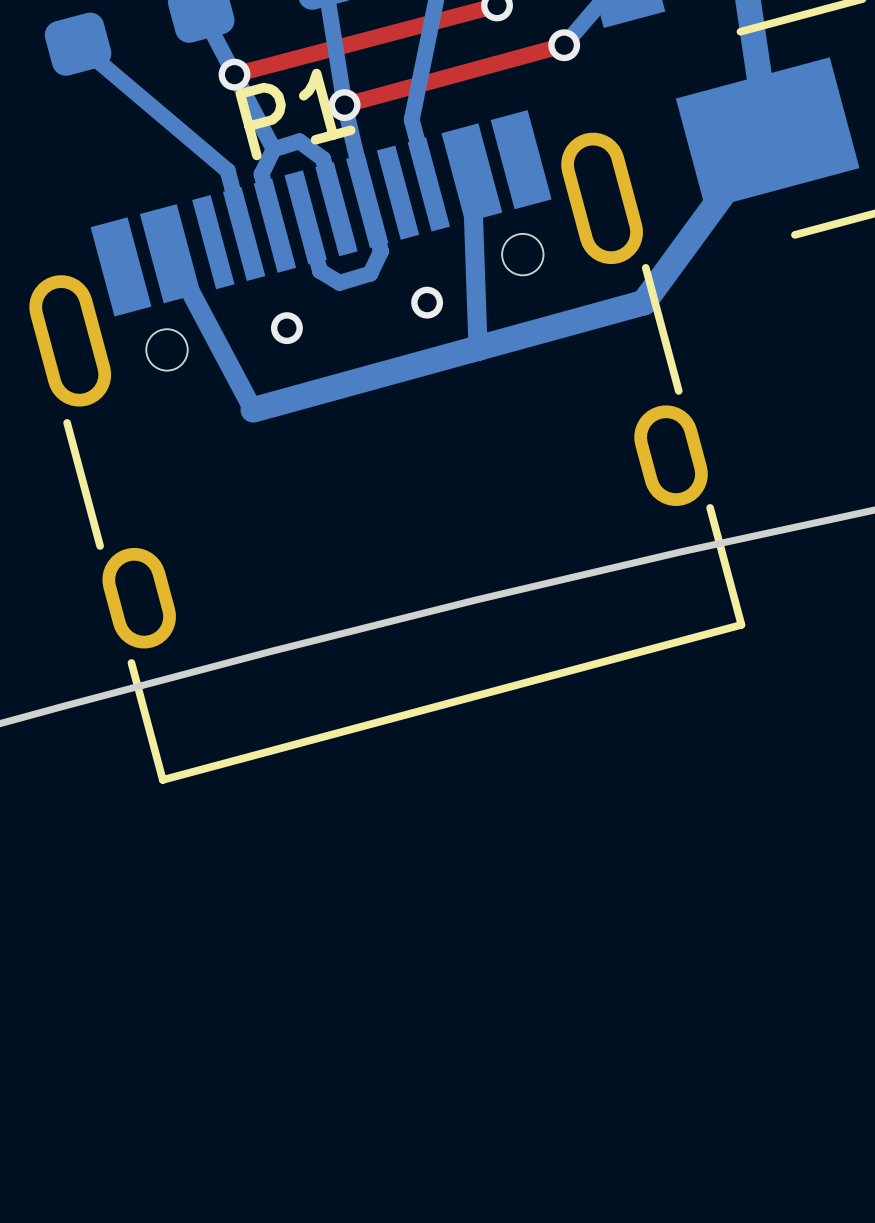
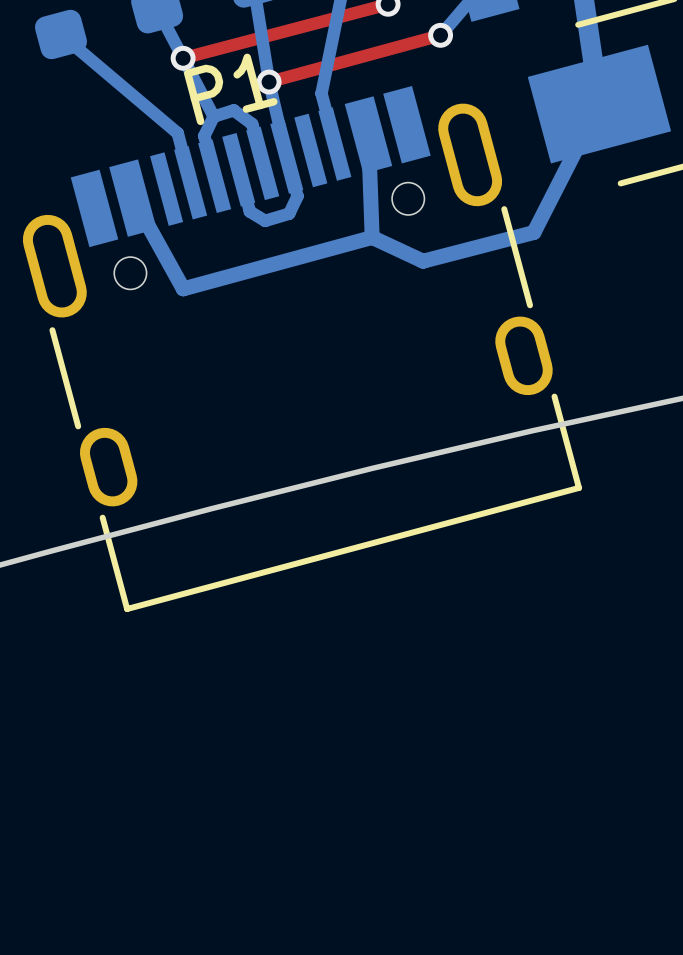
bottom track: (767, 133) (643, 302) (253, 409) (170, 253) -> (599, 104) (533, 232) (423, 261) (372, 237)
bottom track: (471, 172) (478, 348) -> (368, 135) (372, 237)
bottom track: none -> (132, 198) (183, 288) (372, 237)
via: (427, 302) -> none
via: (286, 328) -> none

